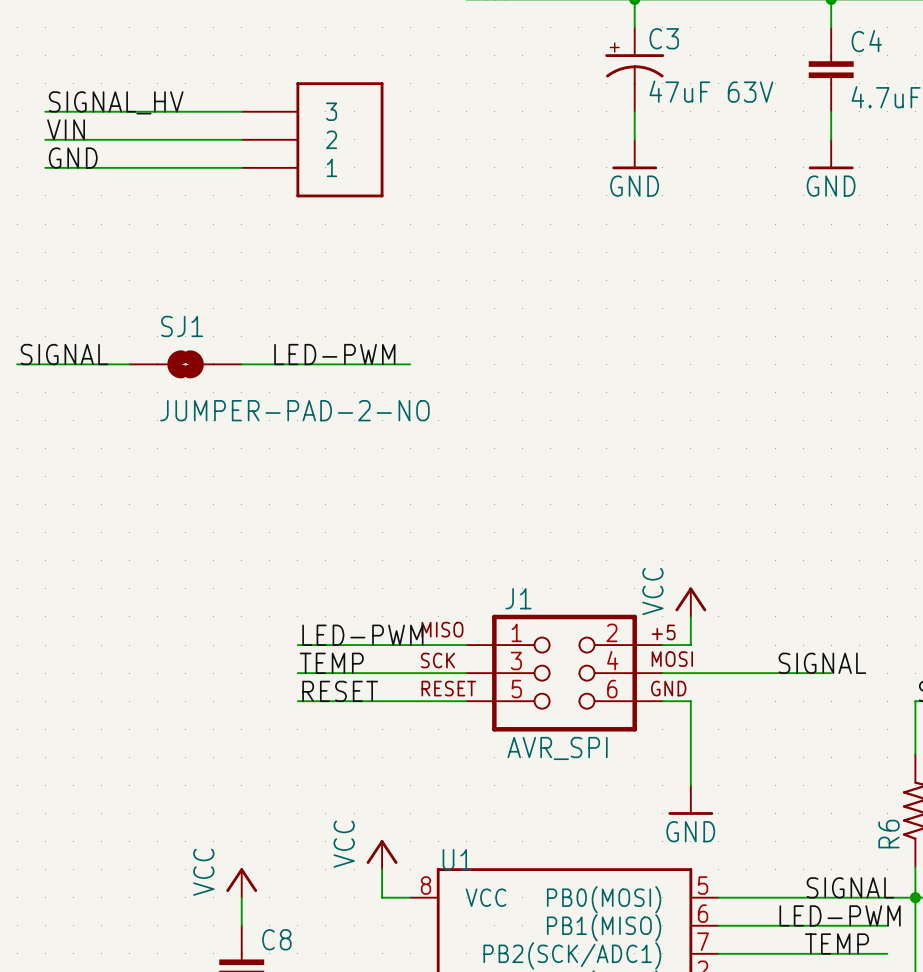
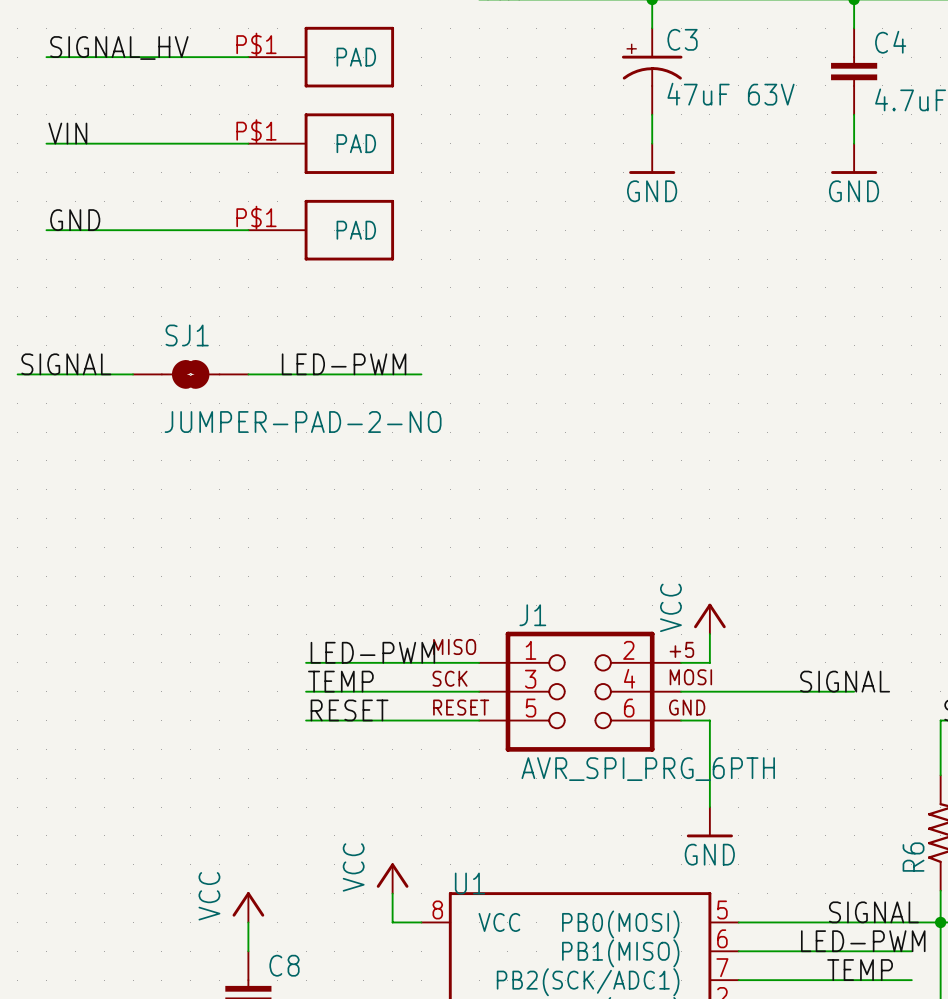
part: none -> (321, 57)
part symbol: [241, 82, 384, 198] -> [248, 113, 395, 174]
label position: SIGNAL_HV (116, 102) -> SIGNAL_HV (119, 48)
wire: (45, 111) (241, 111) -> (46, 57) (248, 57)
label position: GND (73, 158) -> GND (75, 220)
wire: (45, 167) (241, 167) -> (46, 230) (248, 230)
part: none -> (321, 230)
J1 value: AVR_SPI (557, 748) -> AVR_SPI_PRG_6PTH (648, 769)

